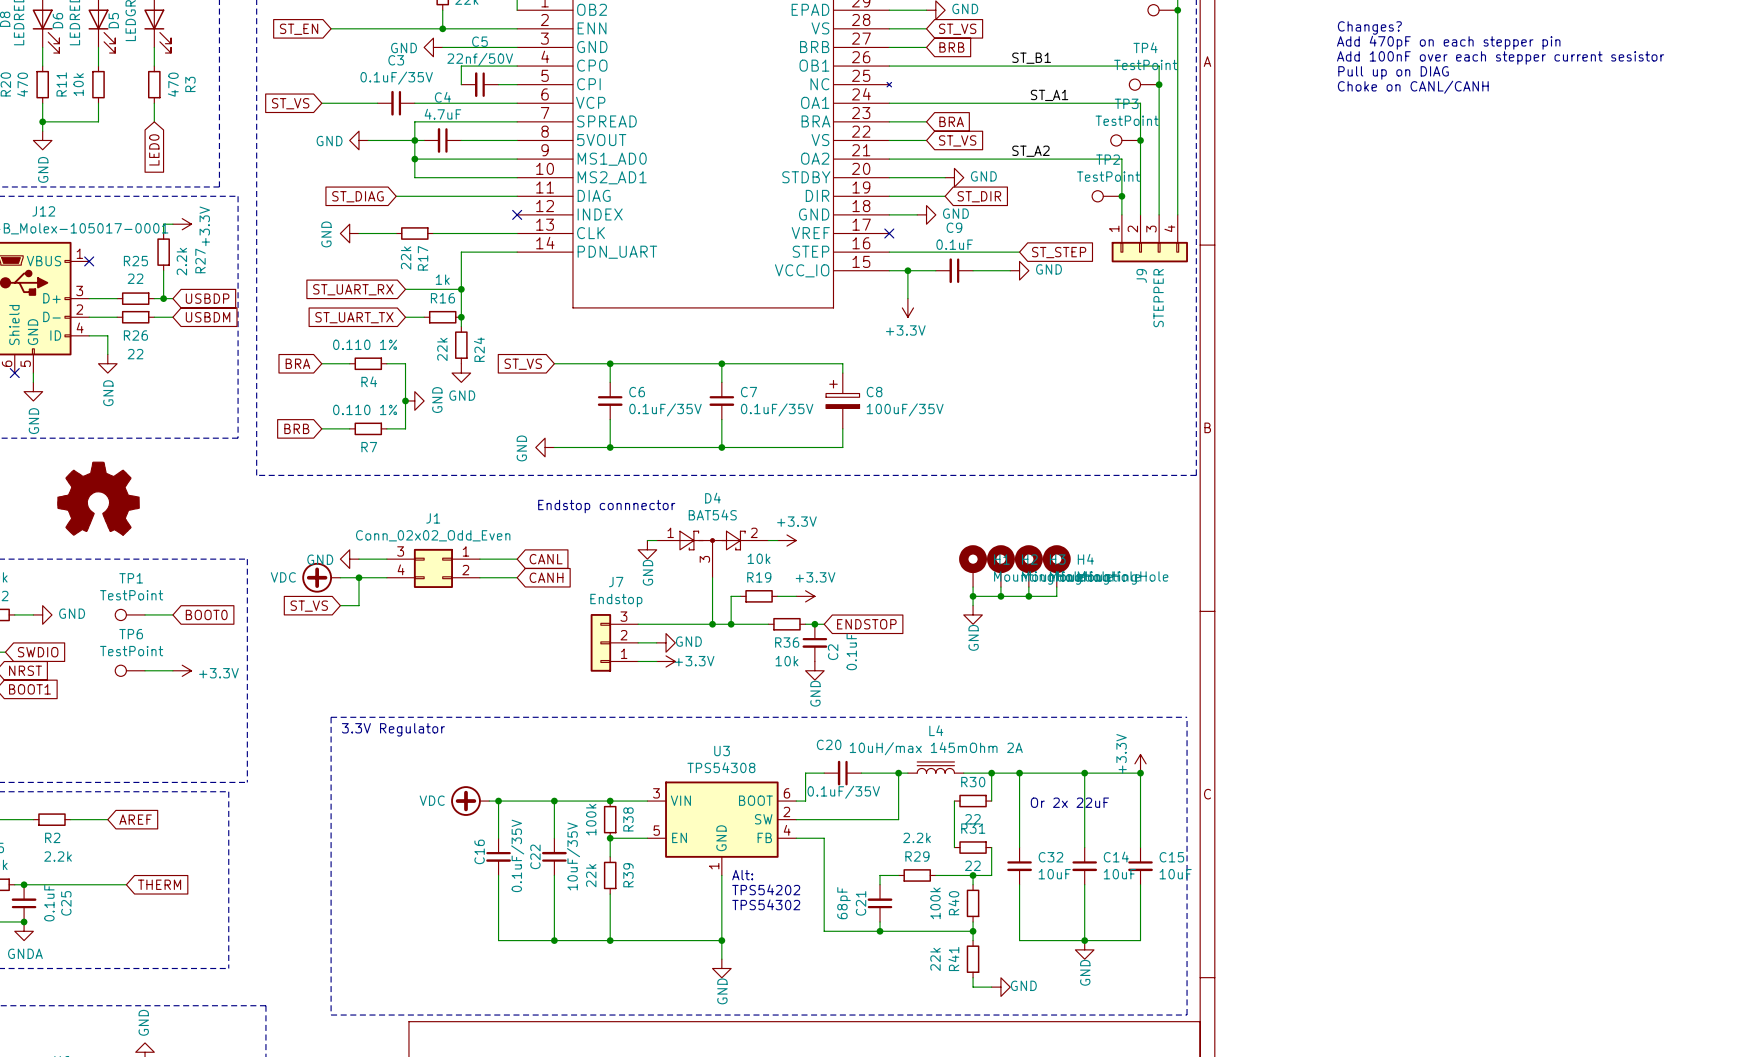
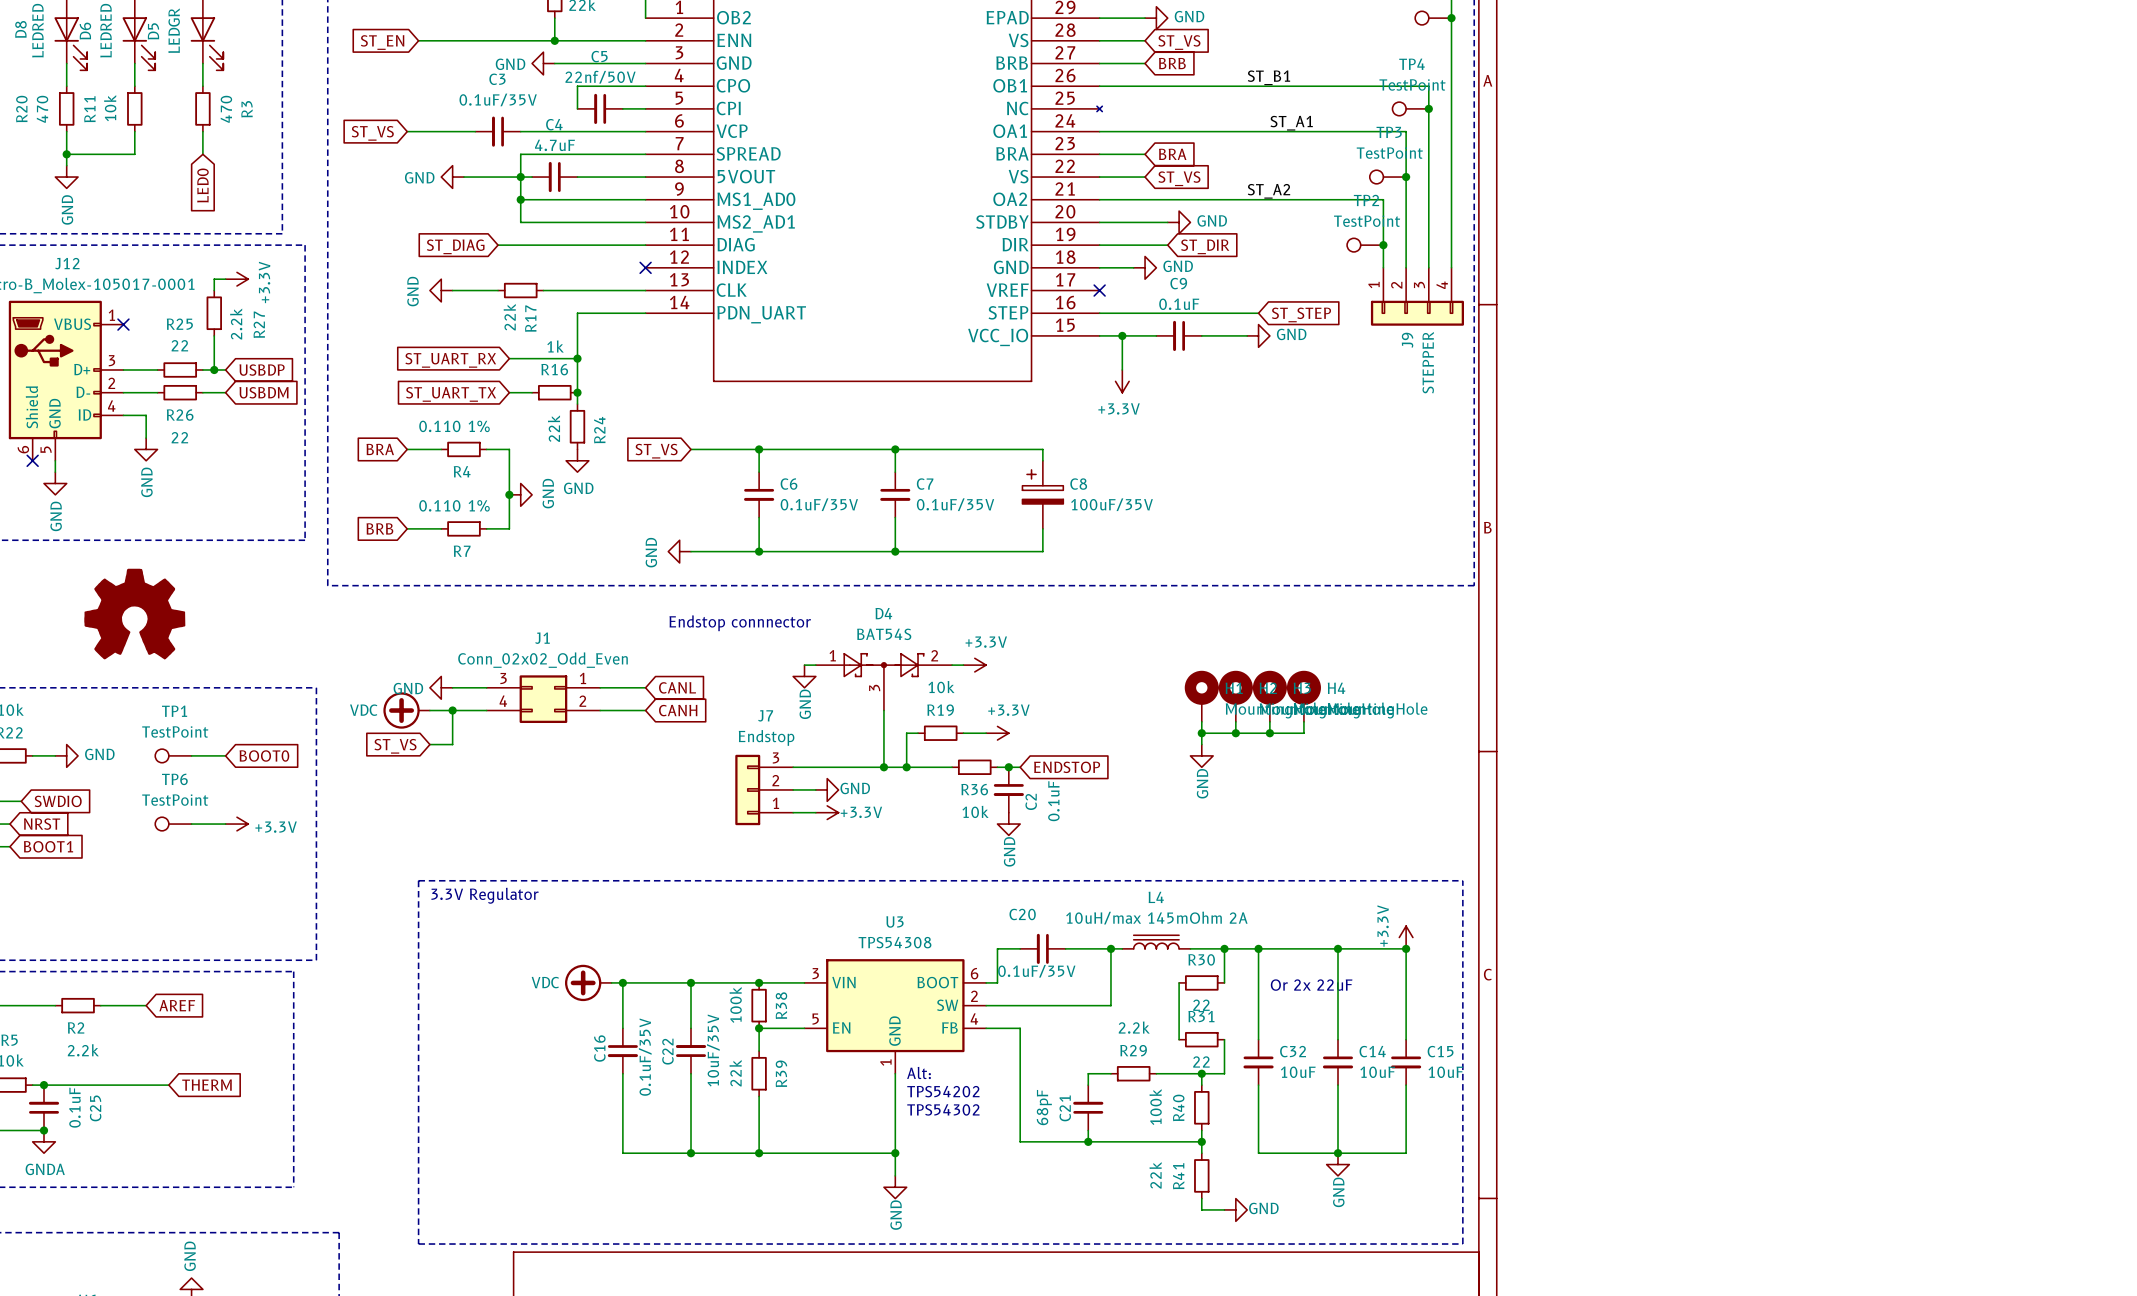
text: Changes? (1369, 27) -> none
text: Add 470pF on each stepper pin (1448, 42) -> none
text: Add 100nF over each stepper current sesistor (1500, 57) -> none
text: Pull up on DIAG (1393, 72) -> none
text: Choke on CANL/CANH (1413, 87) -> none

